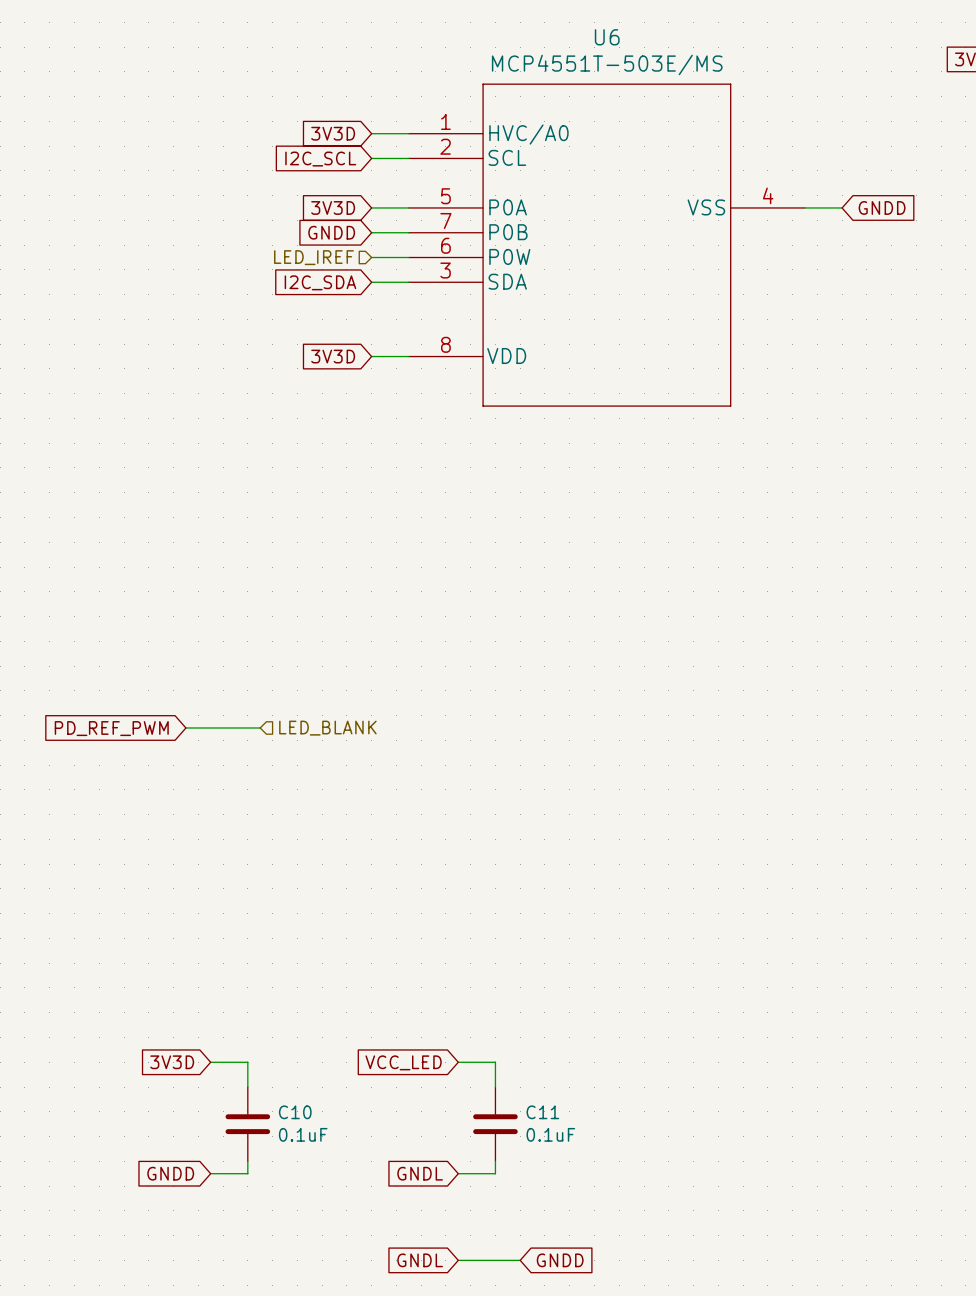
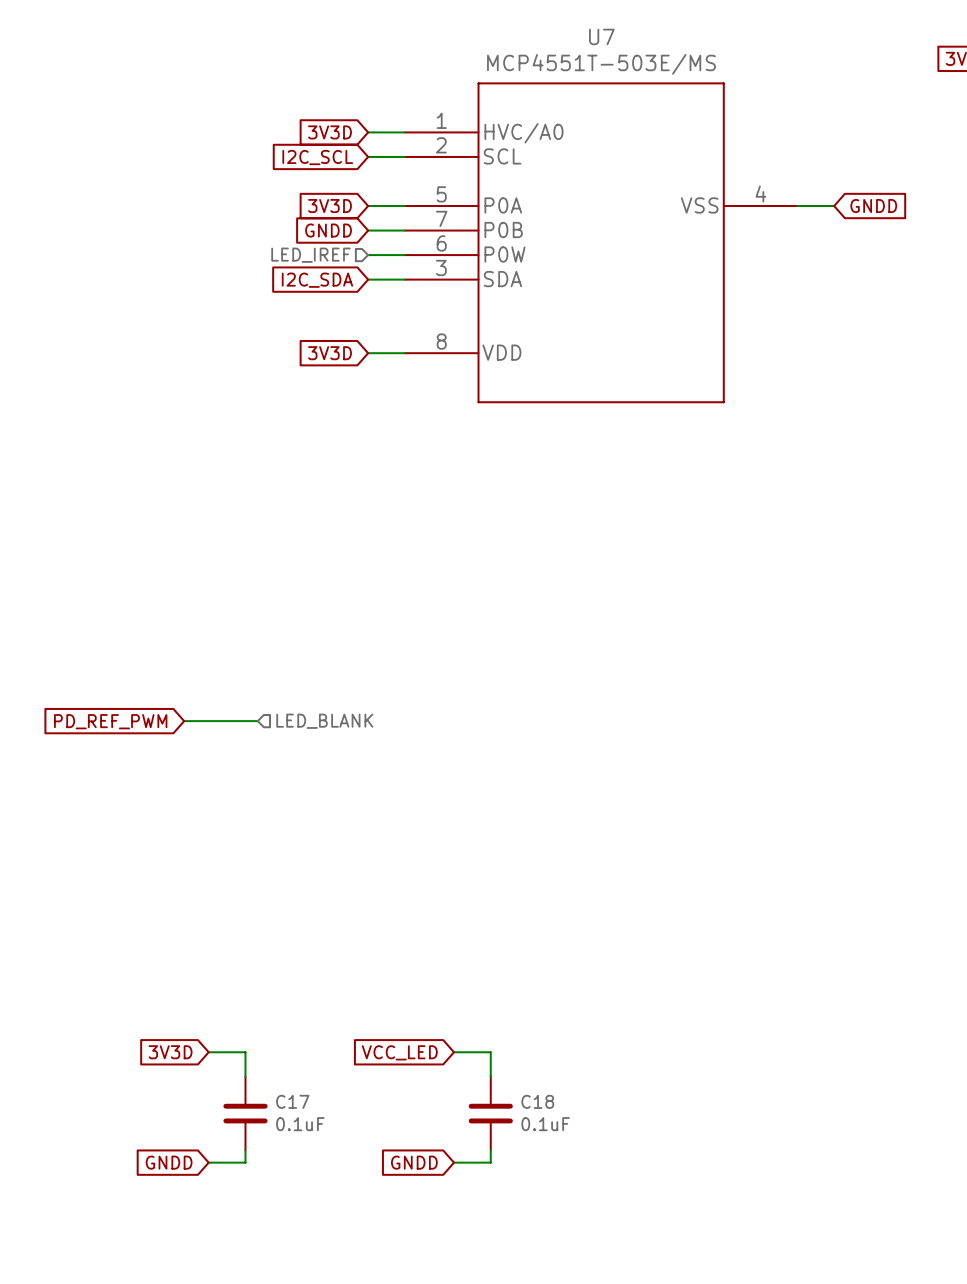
U6 name: U6 (607, 37) -> U7 (601, 36)
C10 name: C10 (295, 1112) -> C17 (292, 1101)
C11 name: C11 (542, 1112) -> C18 (537, 1101)
global label: GNDL (420, 1173) -> GNDD (414, 1162)
global label: GNDL (420, 1260) -> none
wire: (458, 1260) (520, 1260) -> none
global label: GNDD (560, 1260) -> none

